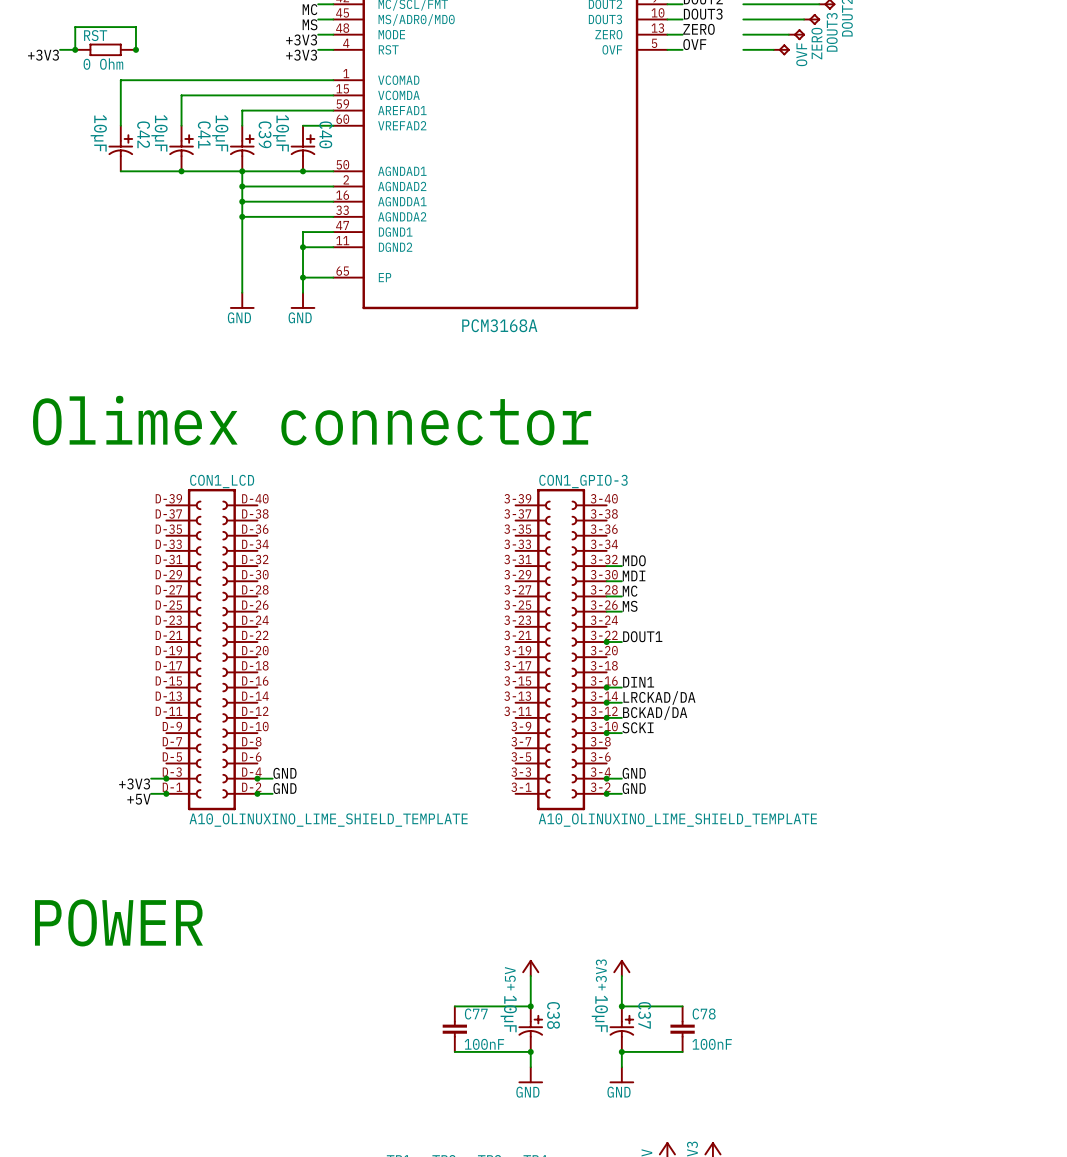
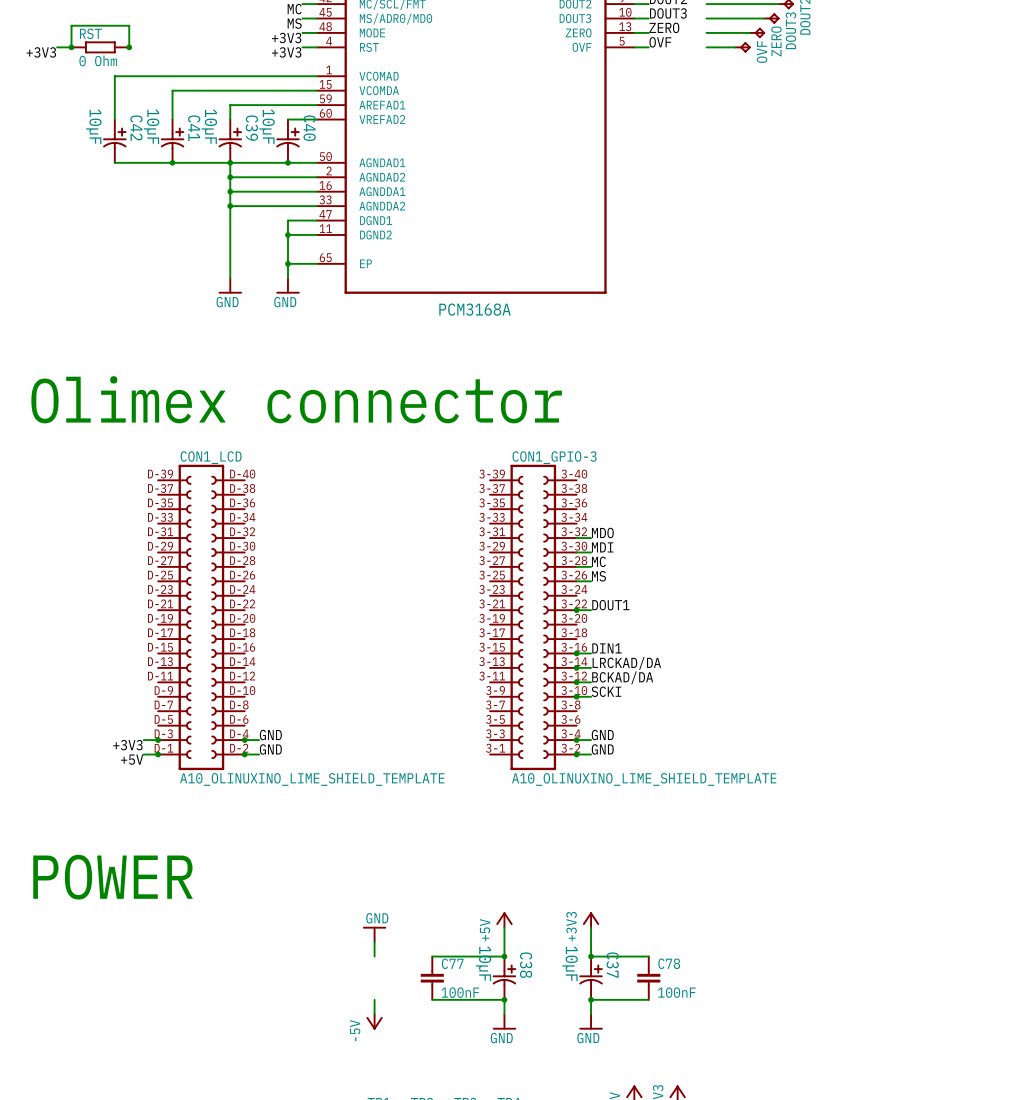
power symbol: none -> GND (374, 934)
wire: none -> (374, 942) (374, 956)
wire: none -> (374, 999) (374, 1014)
power symbol: none -> -5V (374, 1021)

